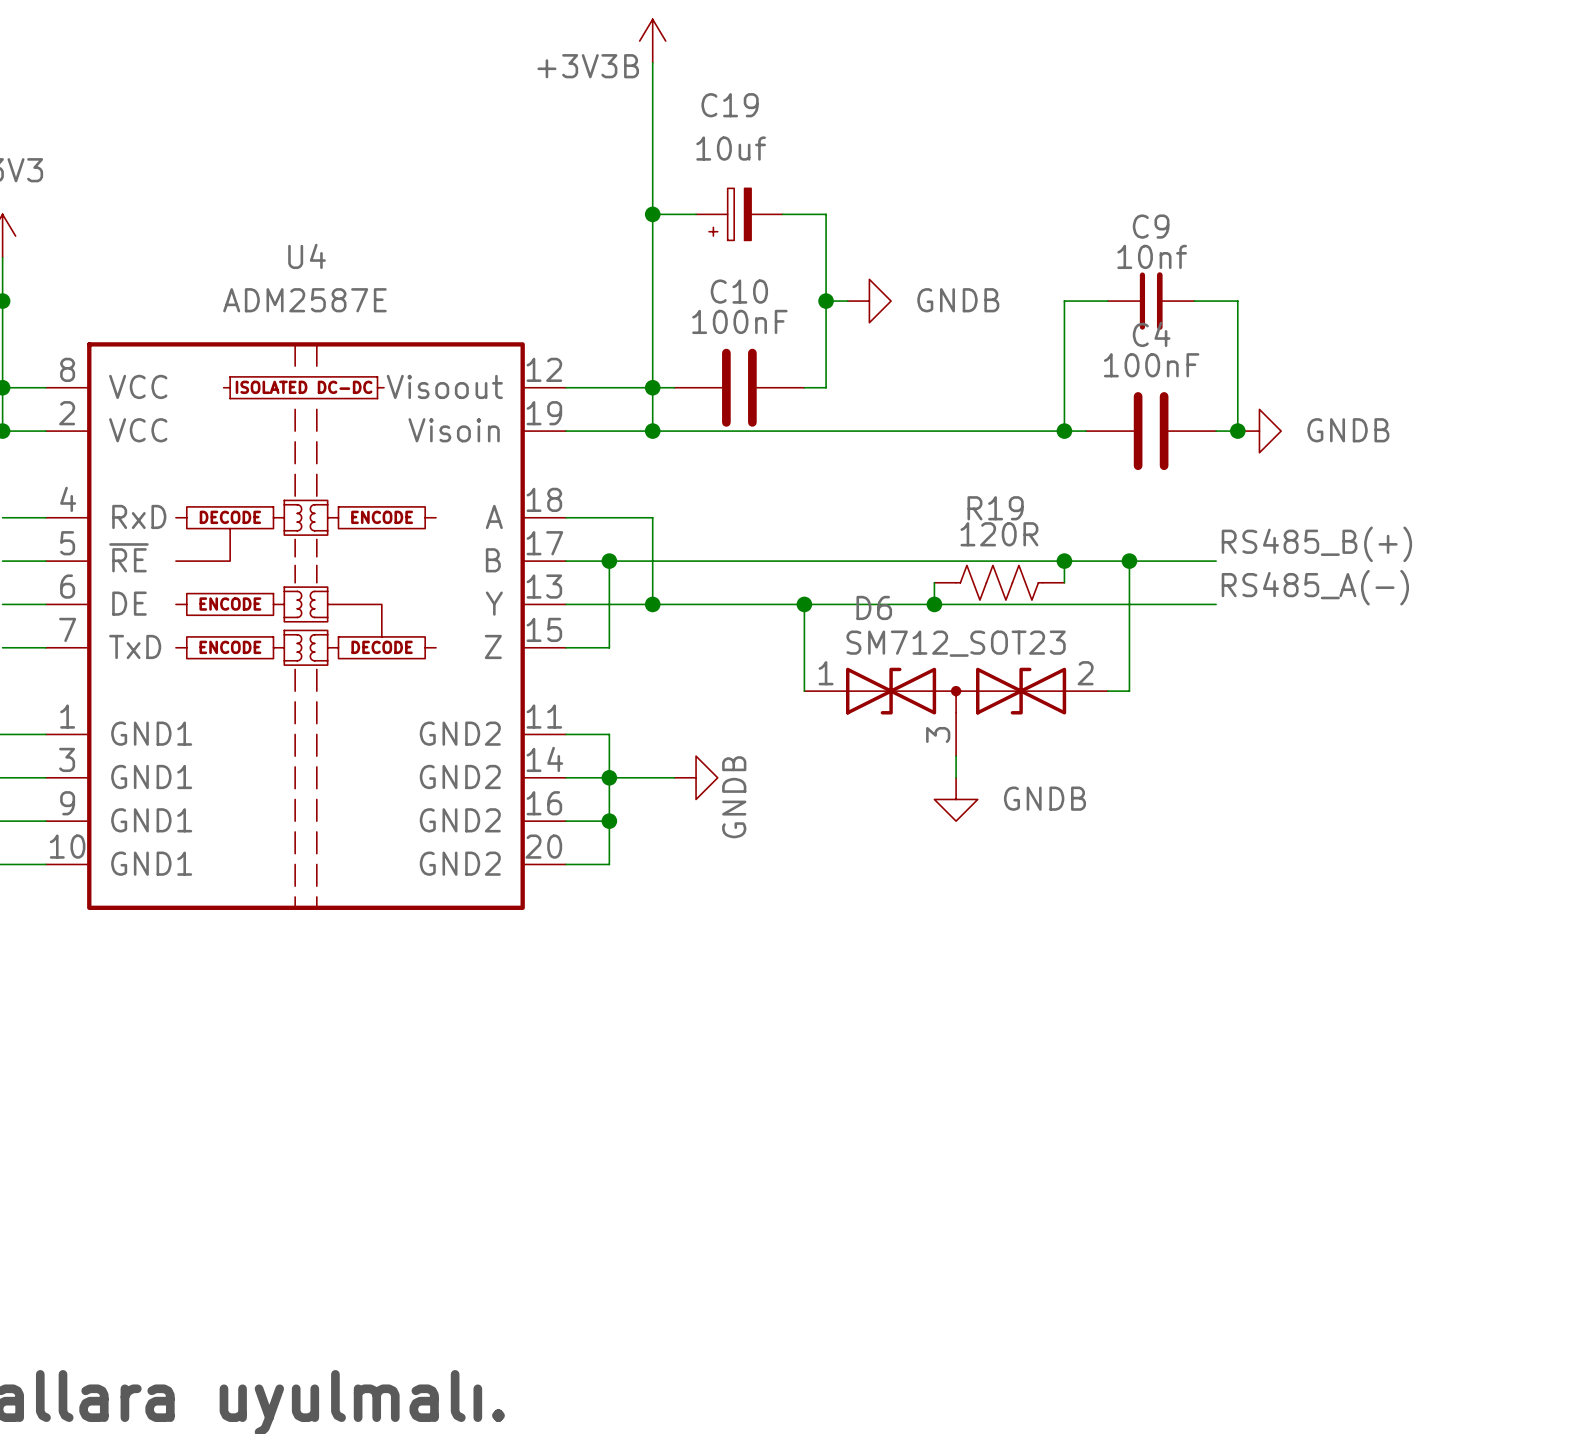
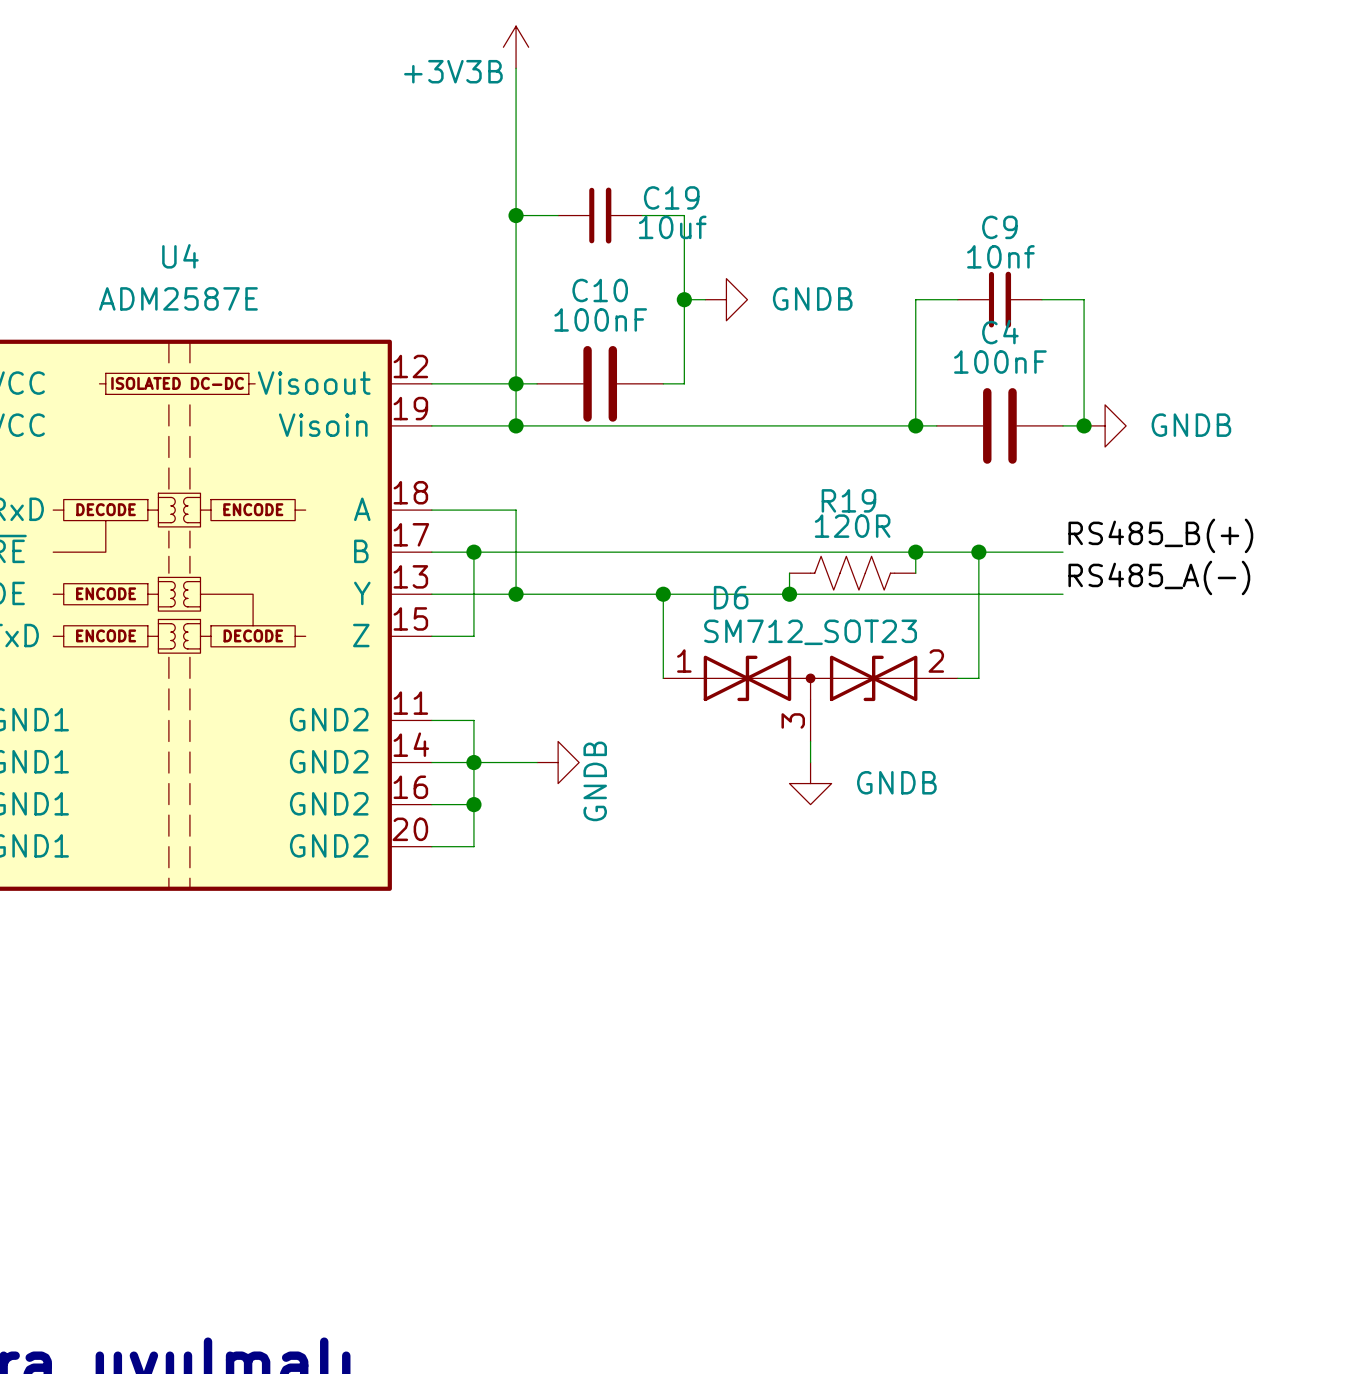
C19 name position: C19 (730, 105) -> C19 (671, 197)
C19 value position: 10uf (731, 148) -> 10uf (672, 227)
C19 symbol: [696, 188, 783, 241] -> [558, 187, 643, 244]

